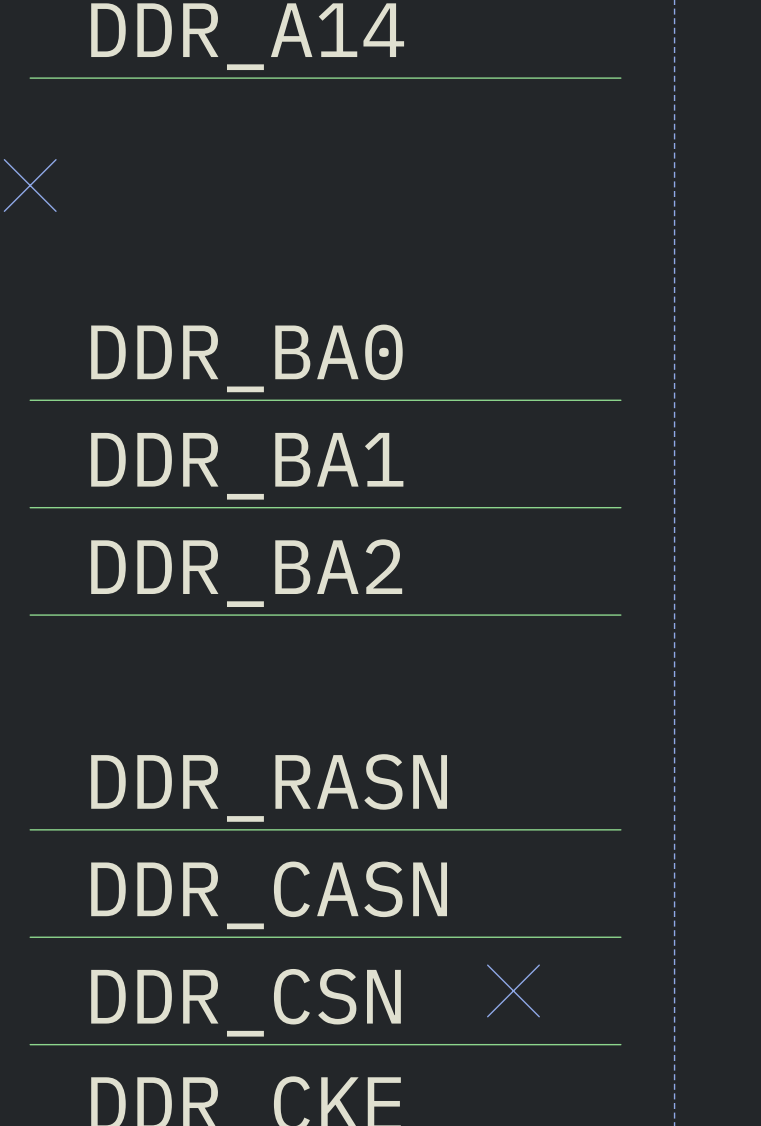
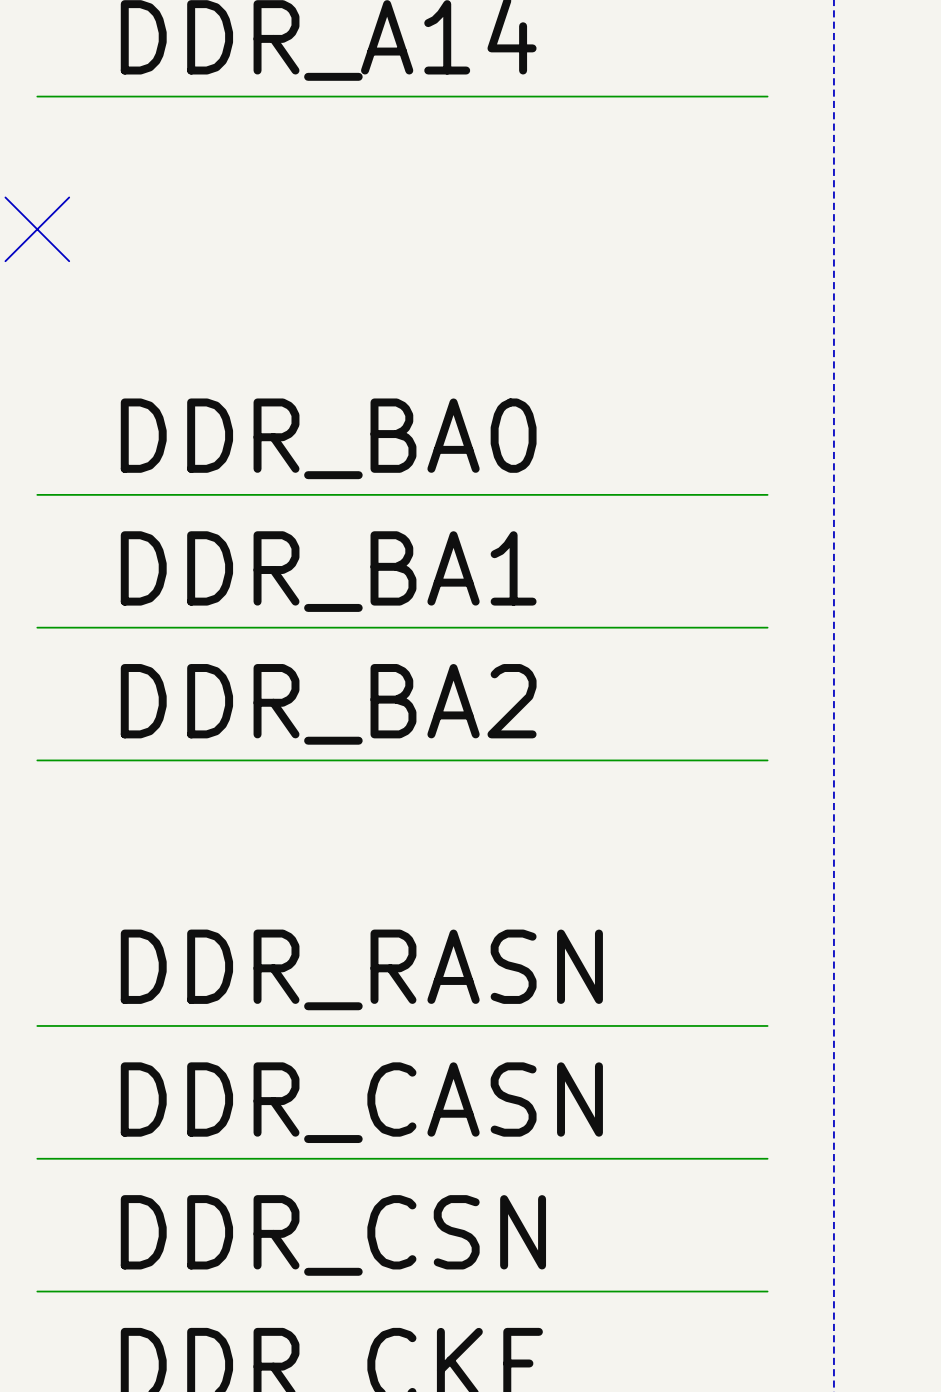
no-connect mark: (513, 990) -> none

